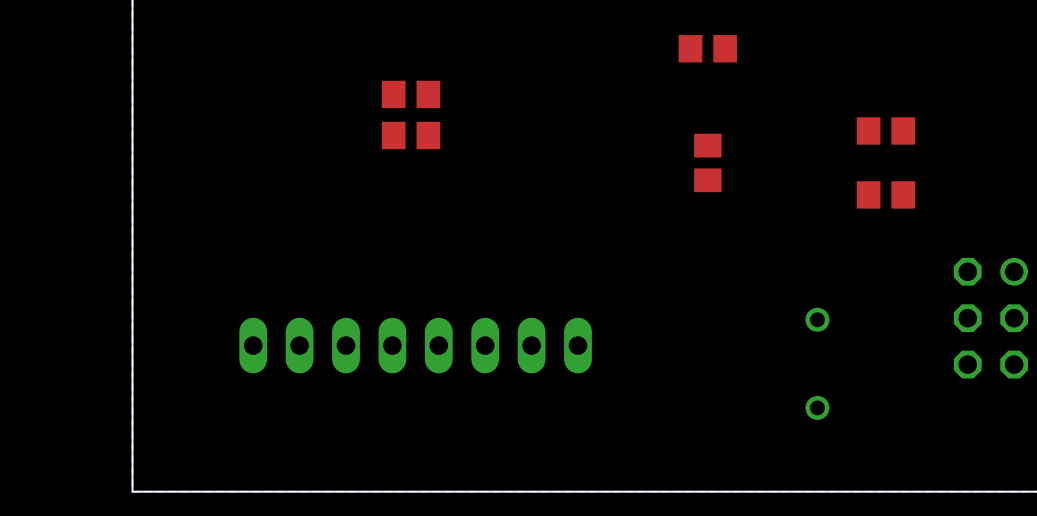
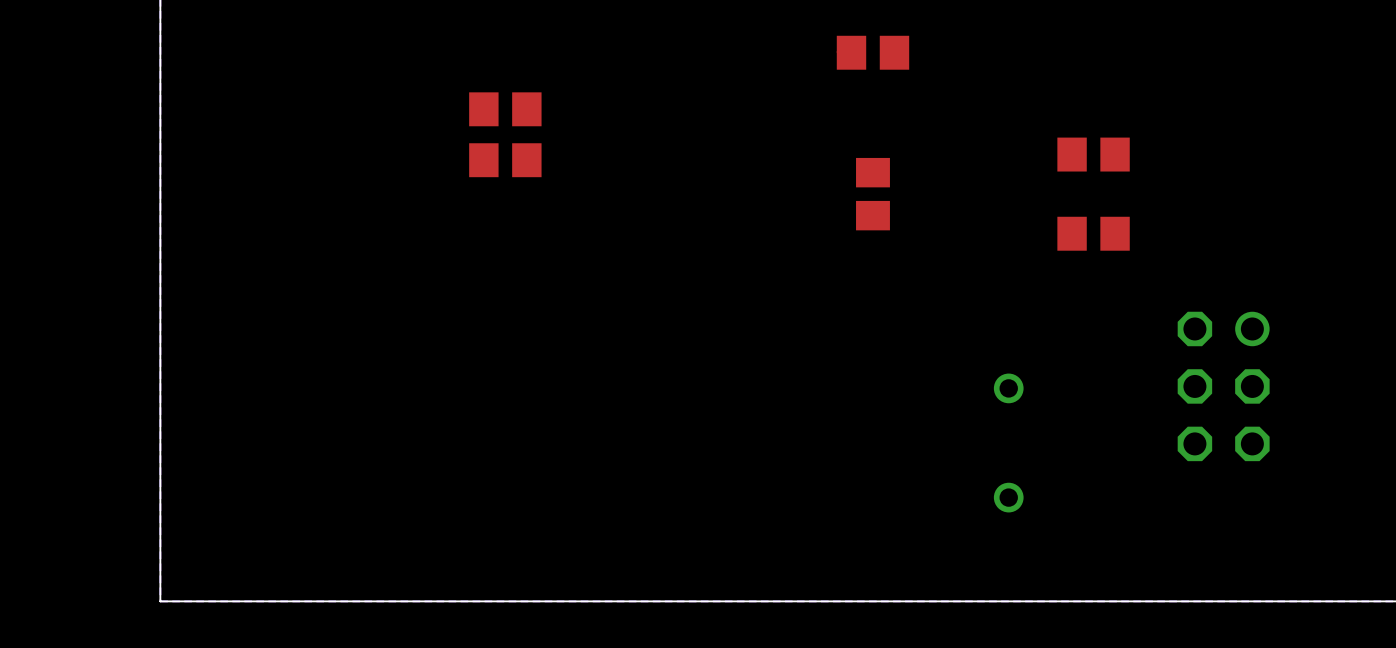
part: (415, 345) -> none

